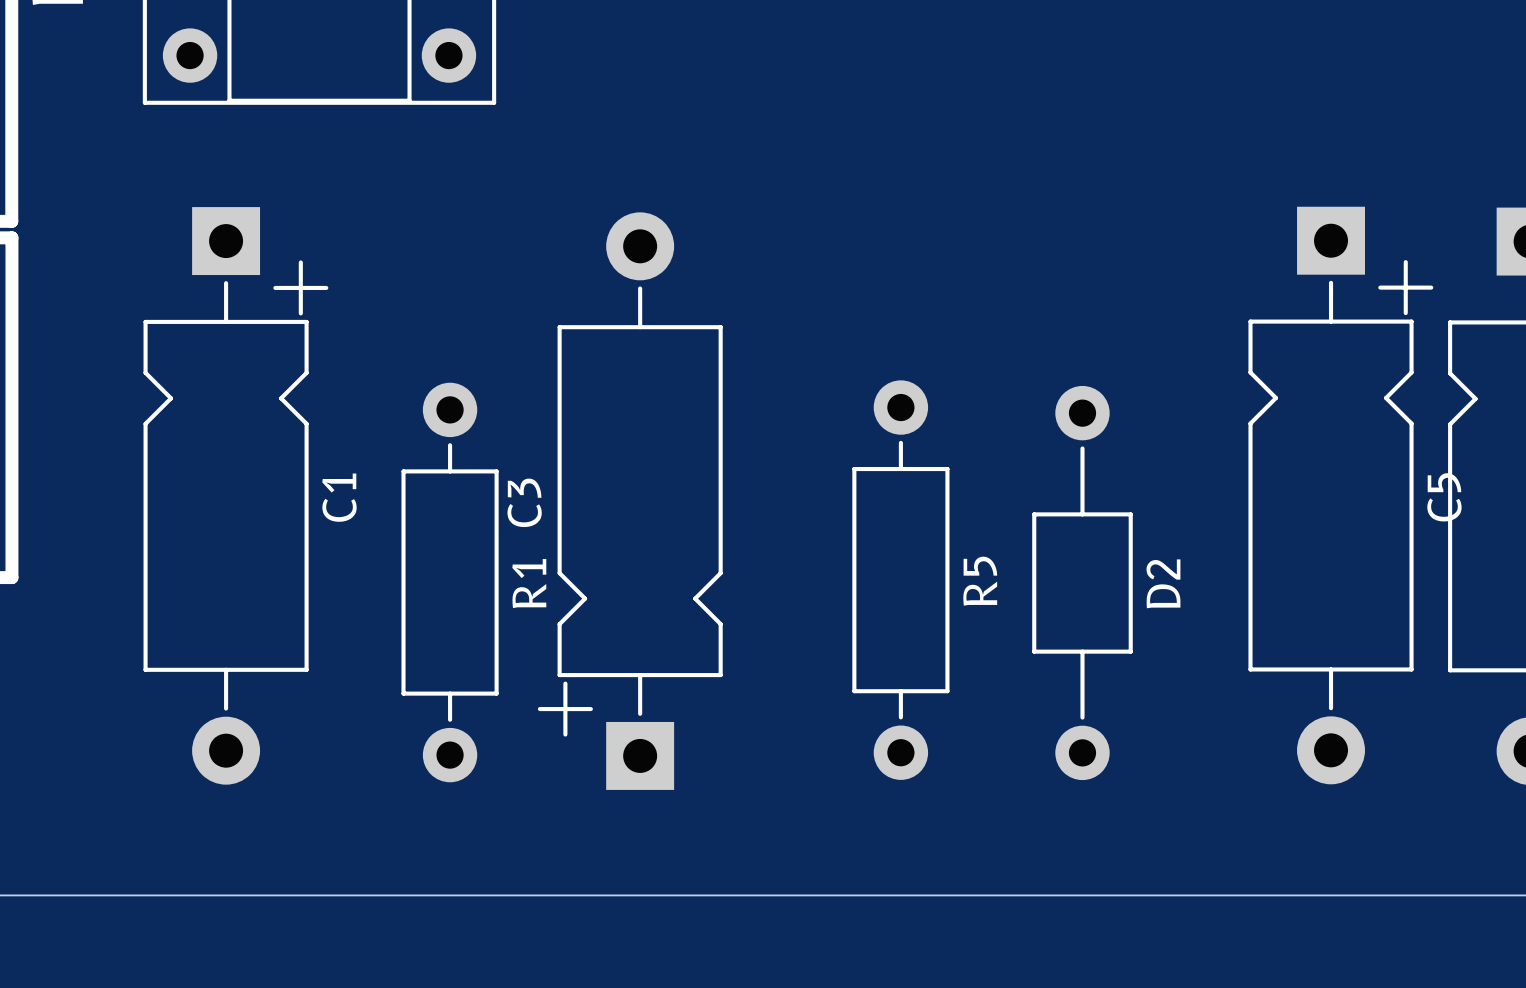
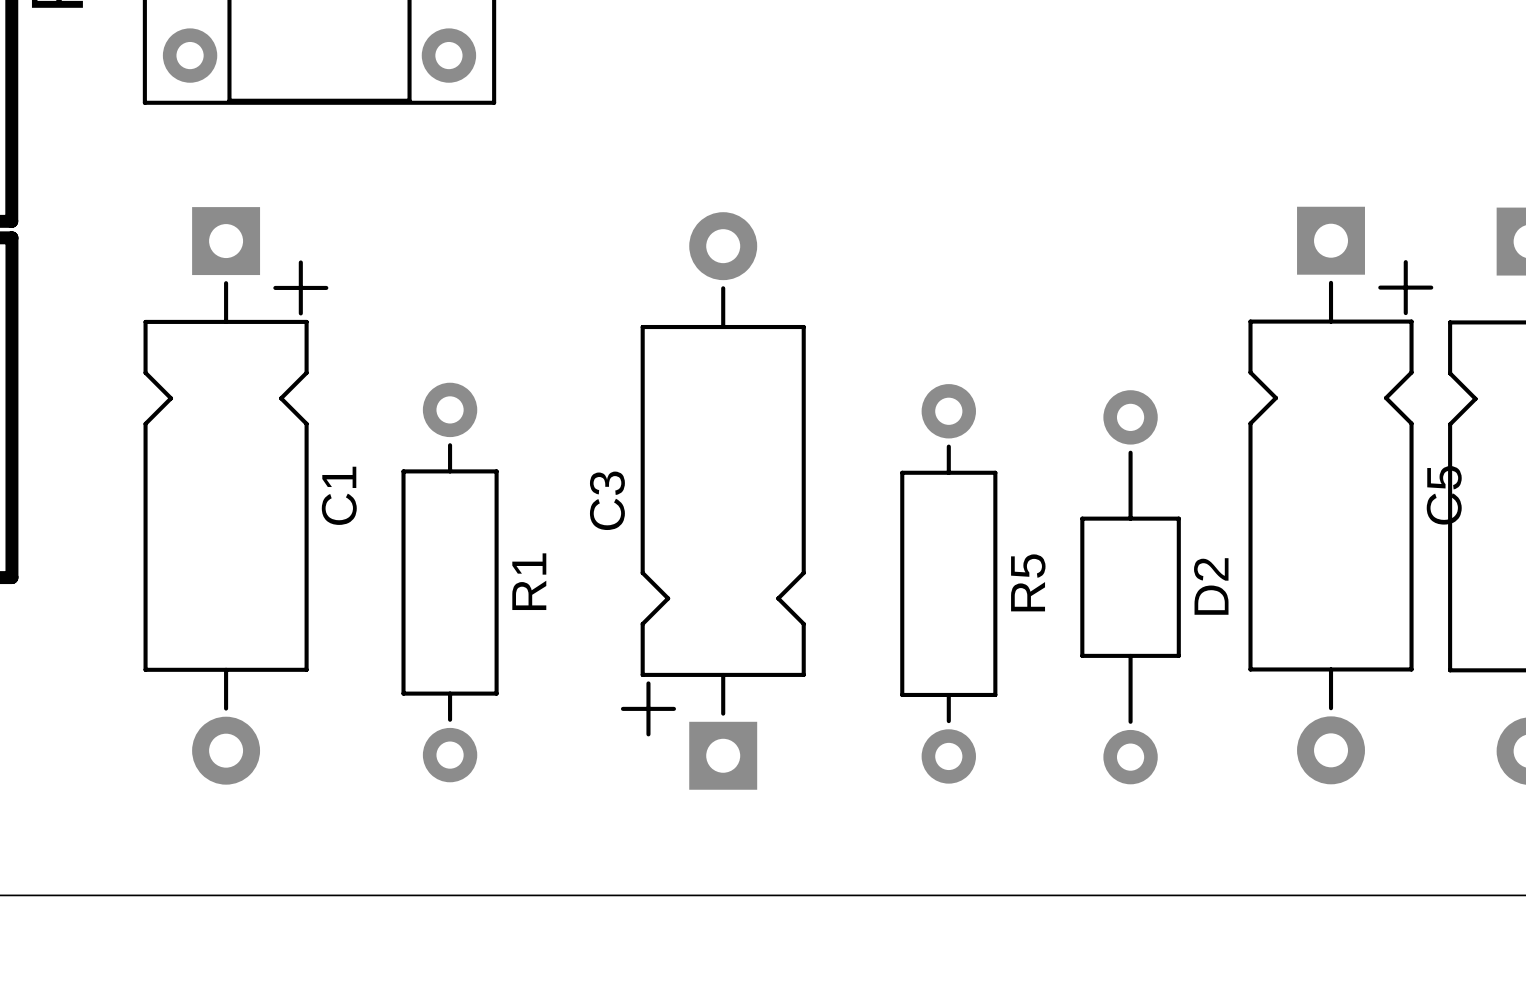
C3 position: (630, 501) -> (713, 500)
R5 position: (900, 580) -> (948, 583)
D2 position: (1082, 583) -> (1130, 587)

